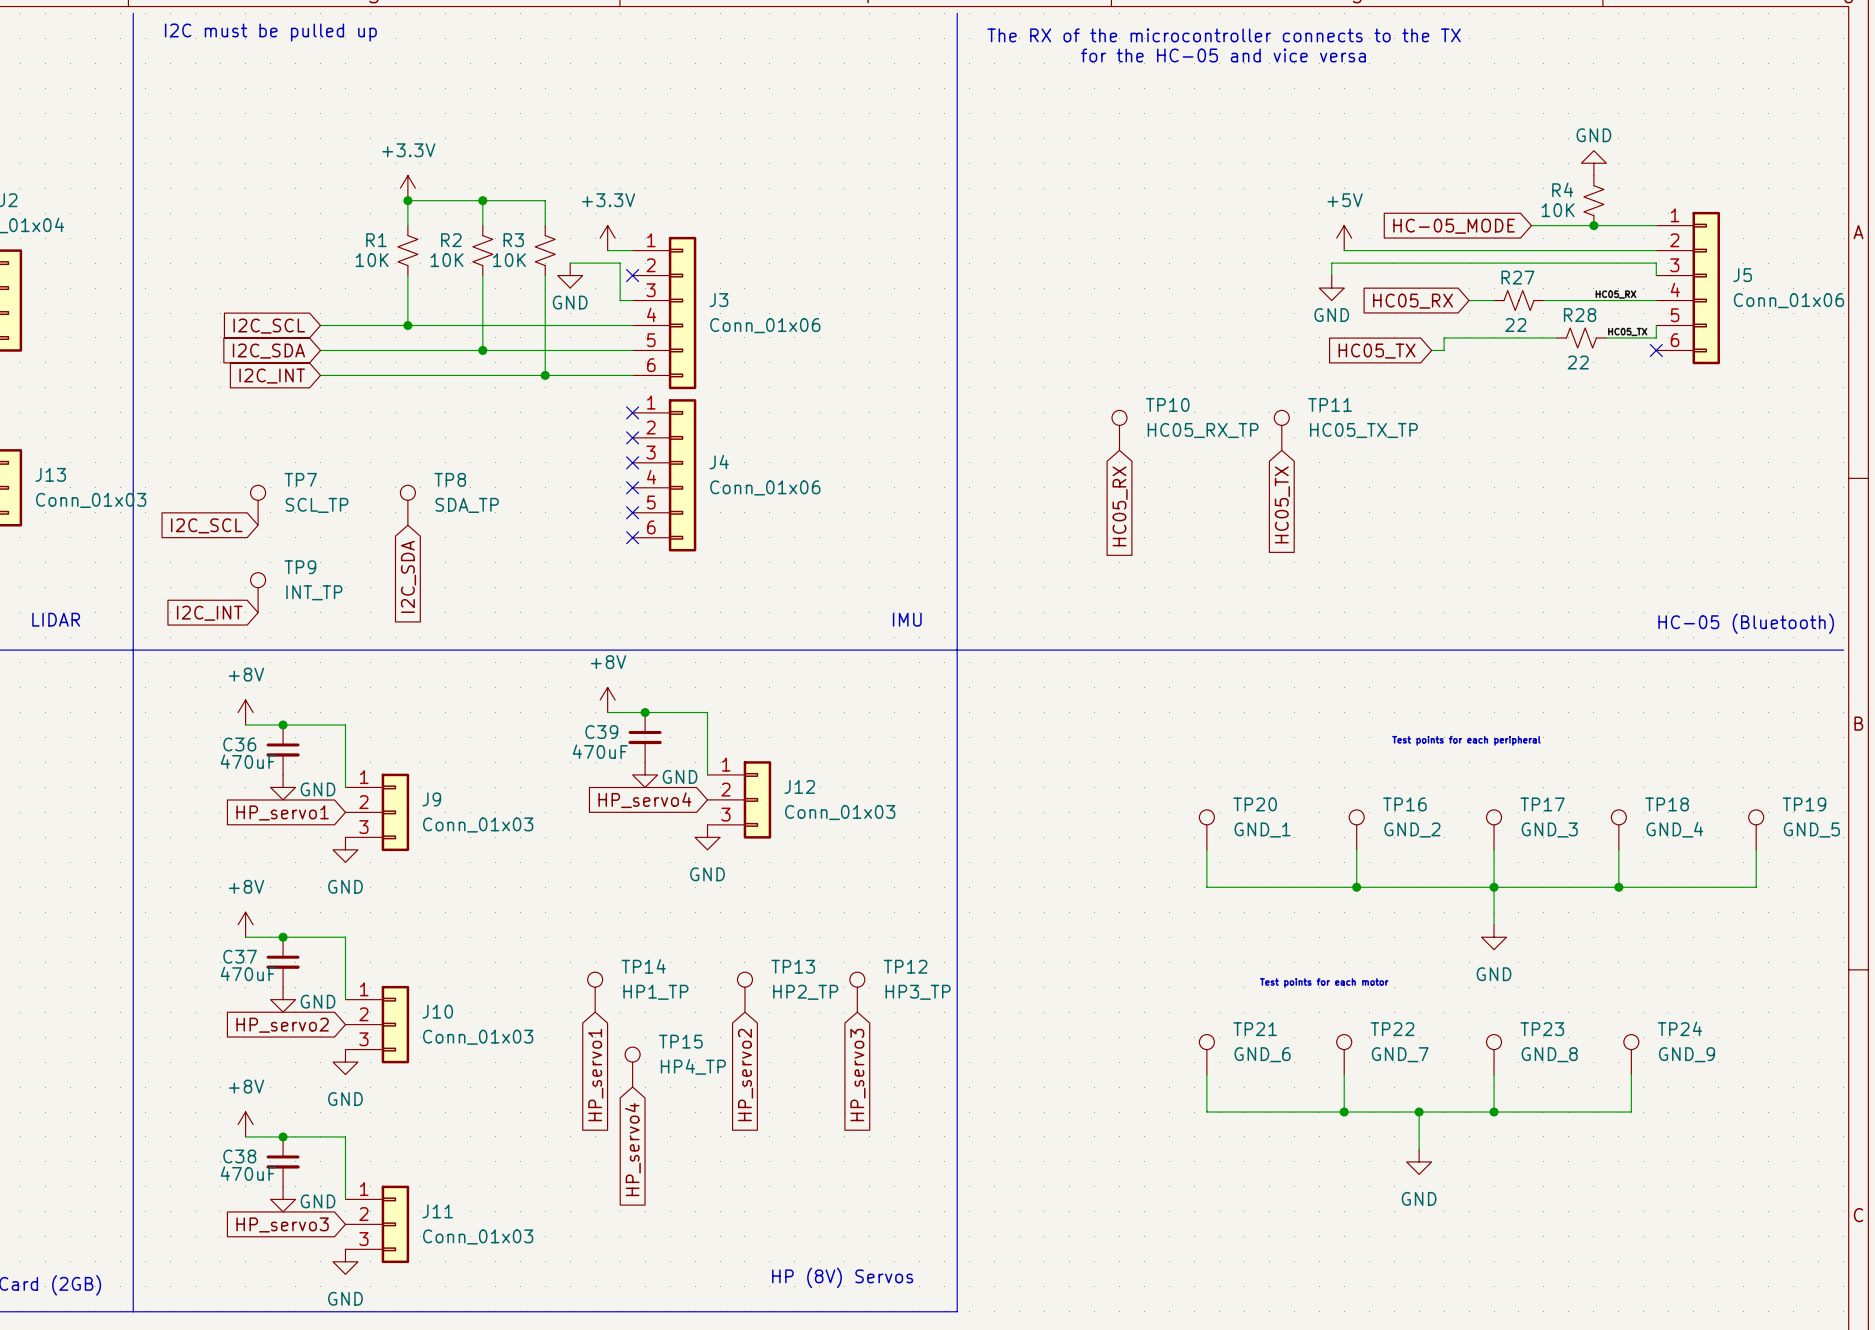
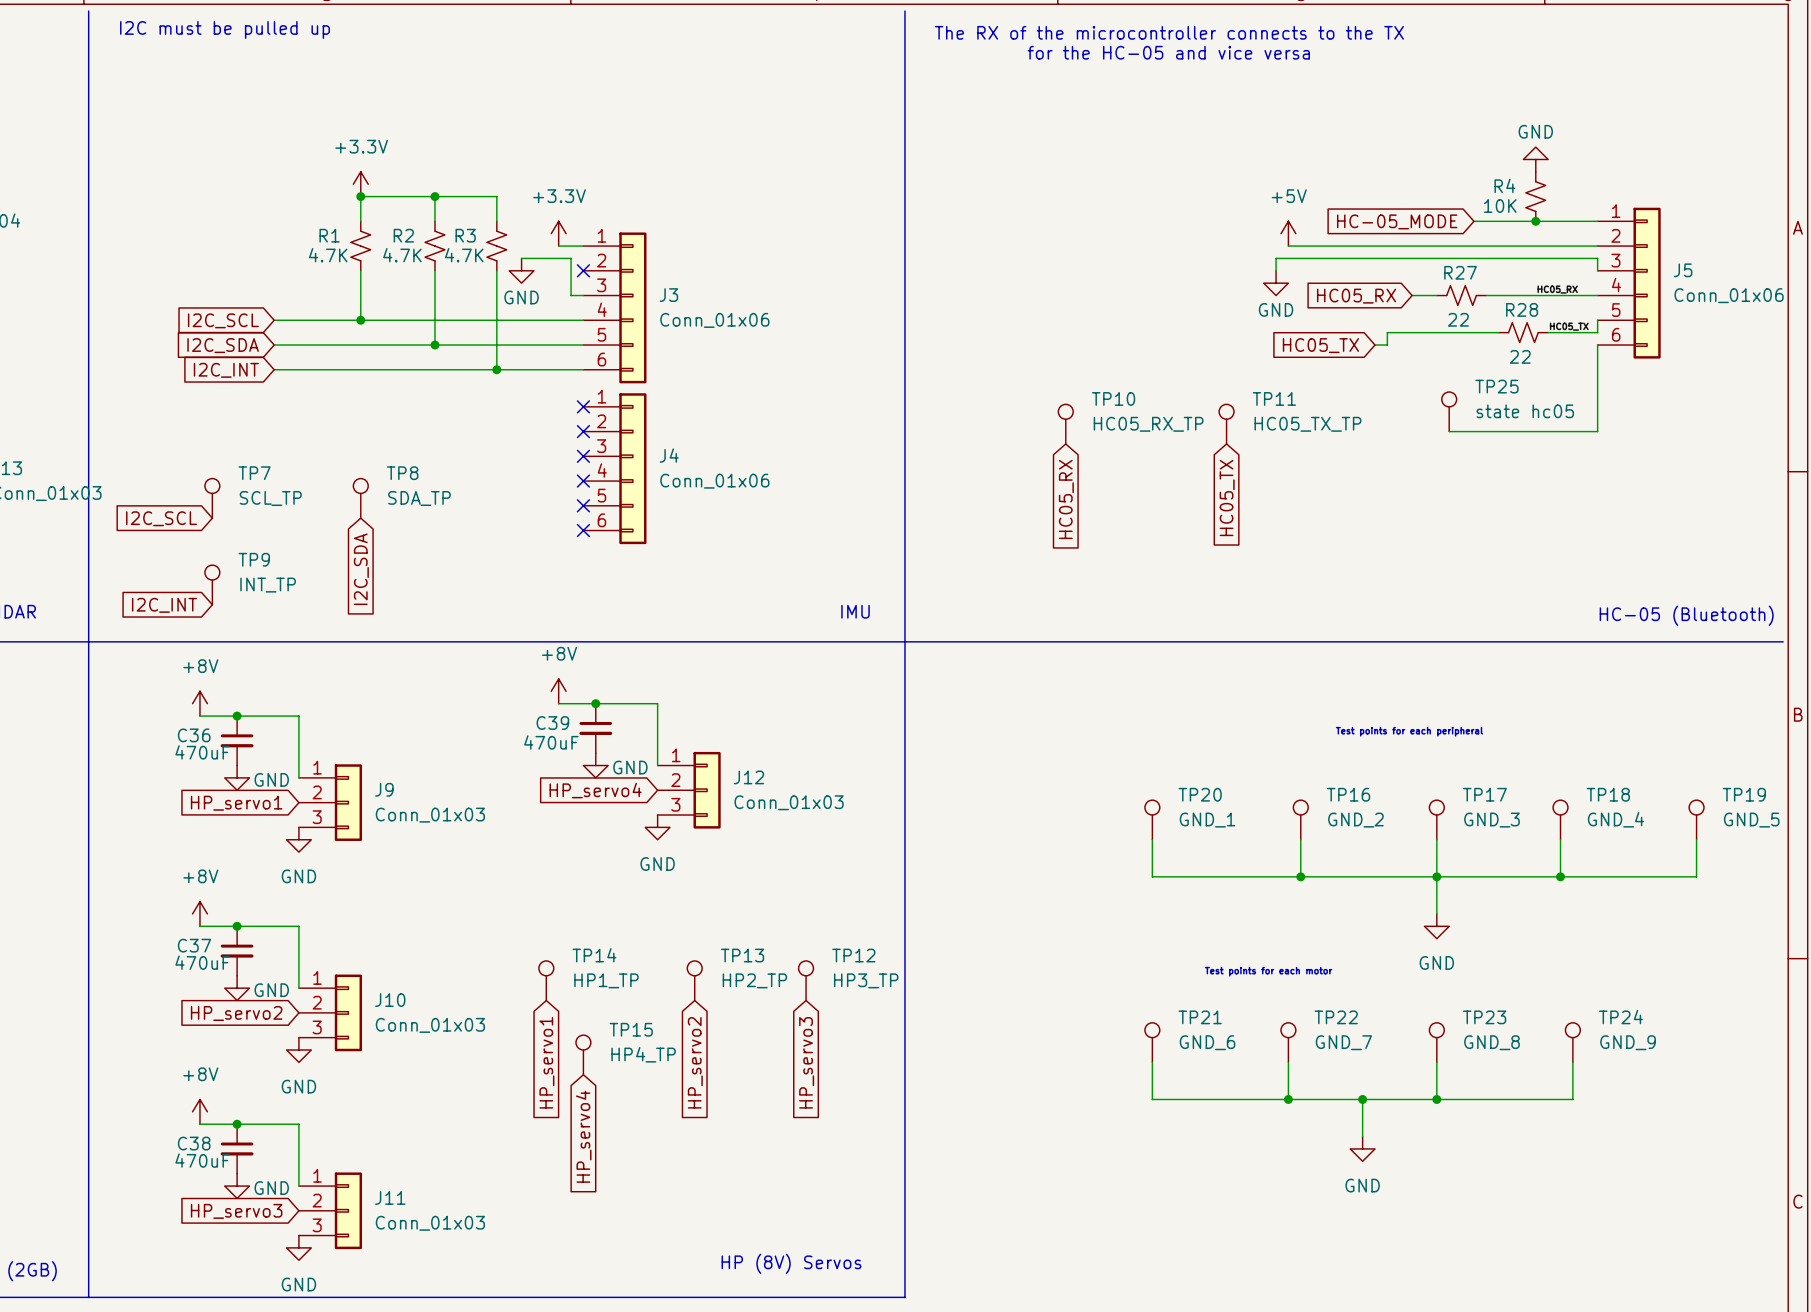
R1 value: 10K (372, 260) -> 4.7K (328, 255)
R2 value: 10K (446, 260) -> 4.7K (402, 255)
R3 value: 10K (509, 260) -> 4.7K (464, 255)
wire: none -> (1597, 345) (1597, 431) (1449, 431)
no-connect mark: (1656, 350) -> none
TP25: none -> state hc05 (1449, 411)

